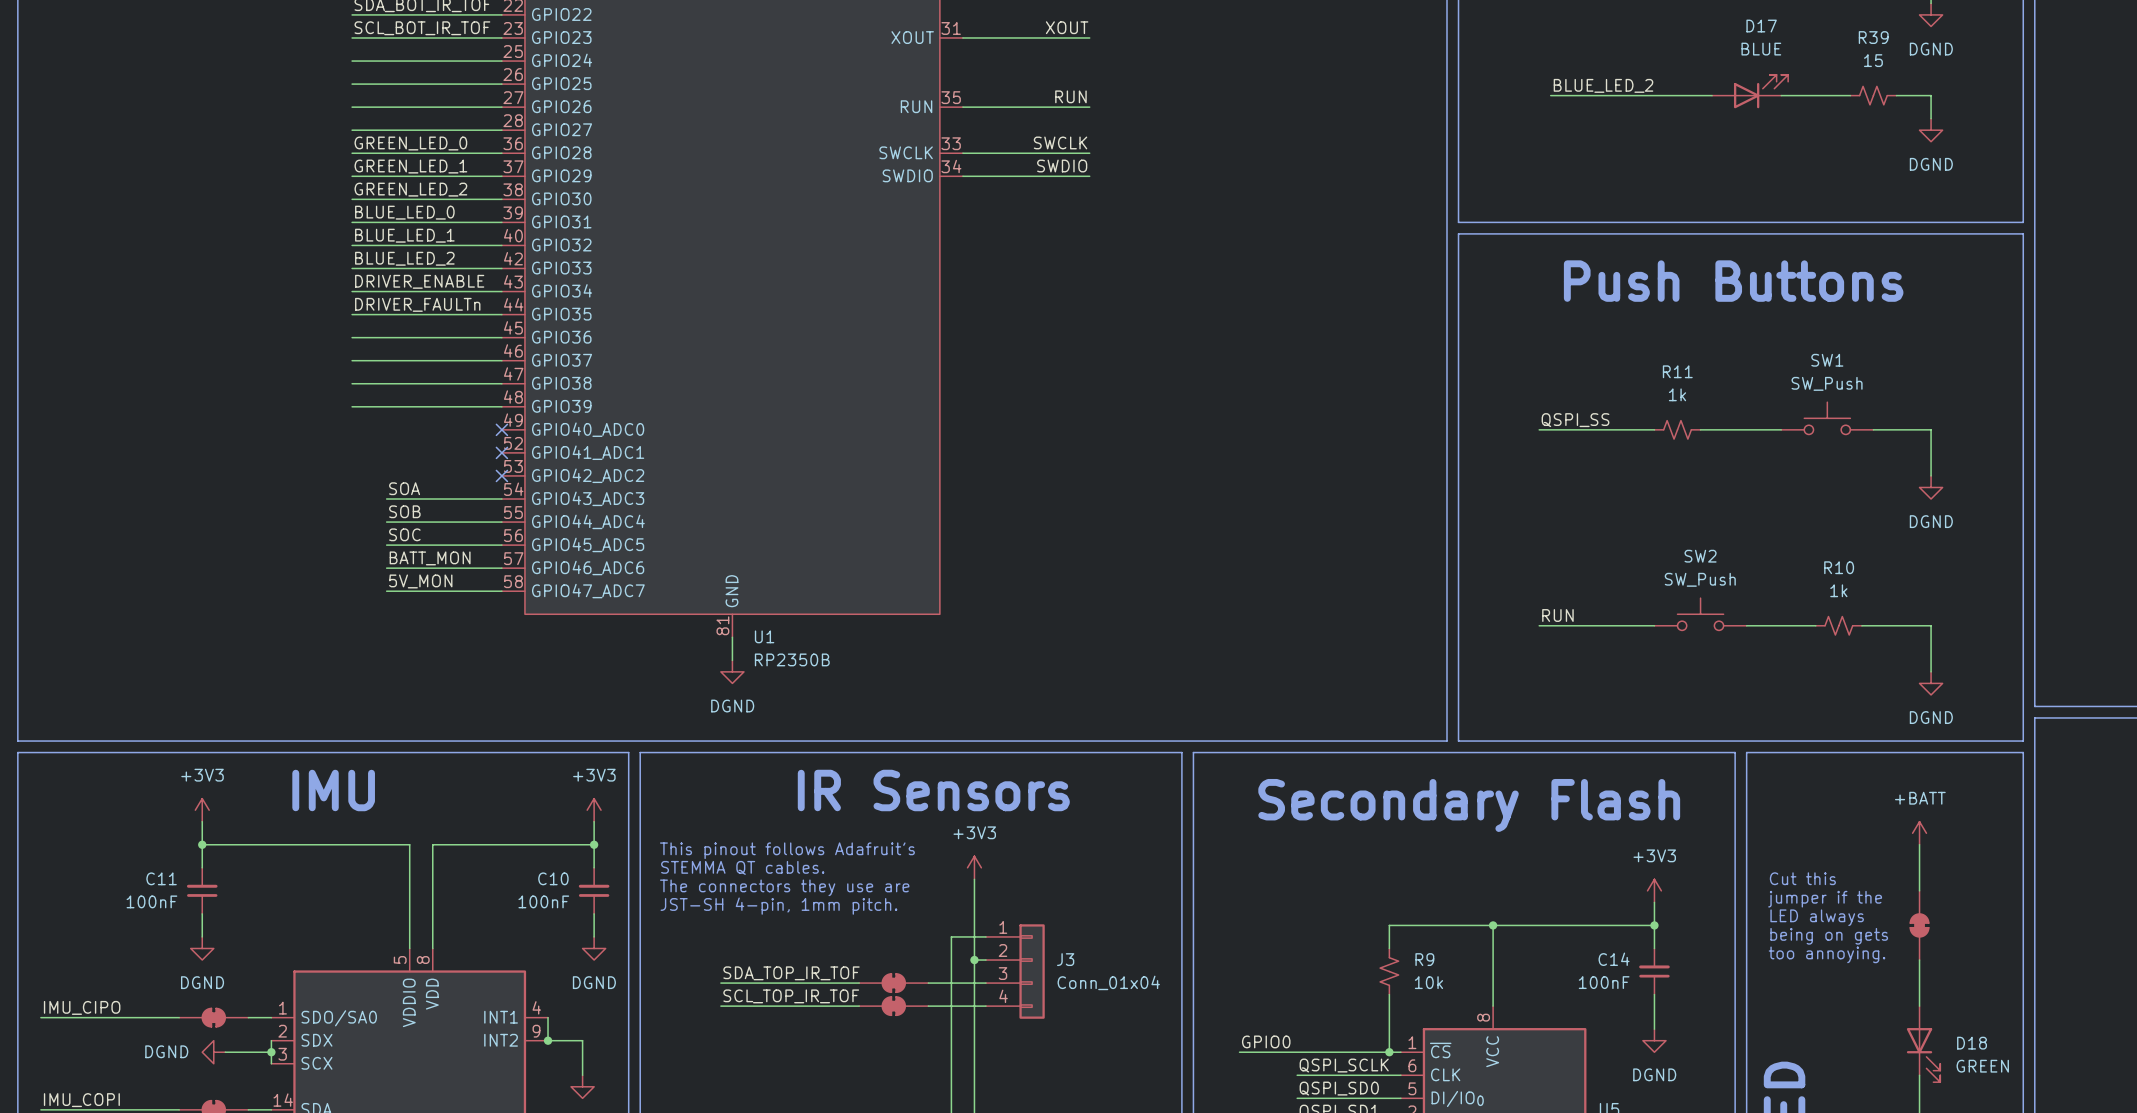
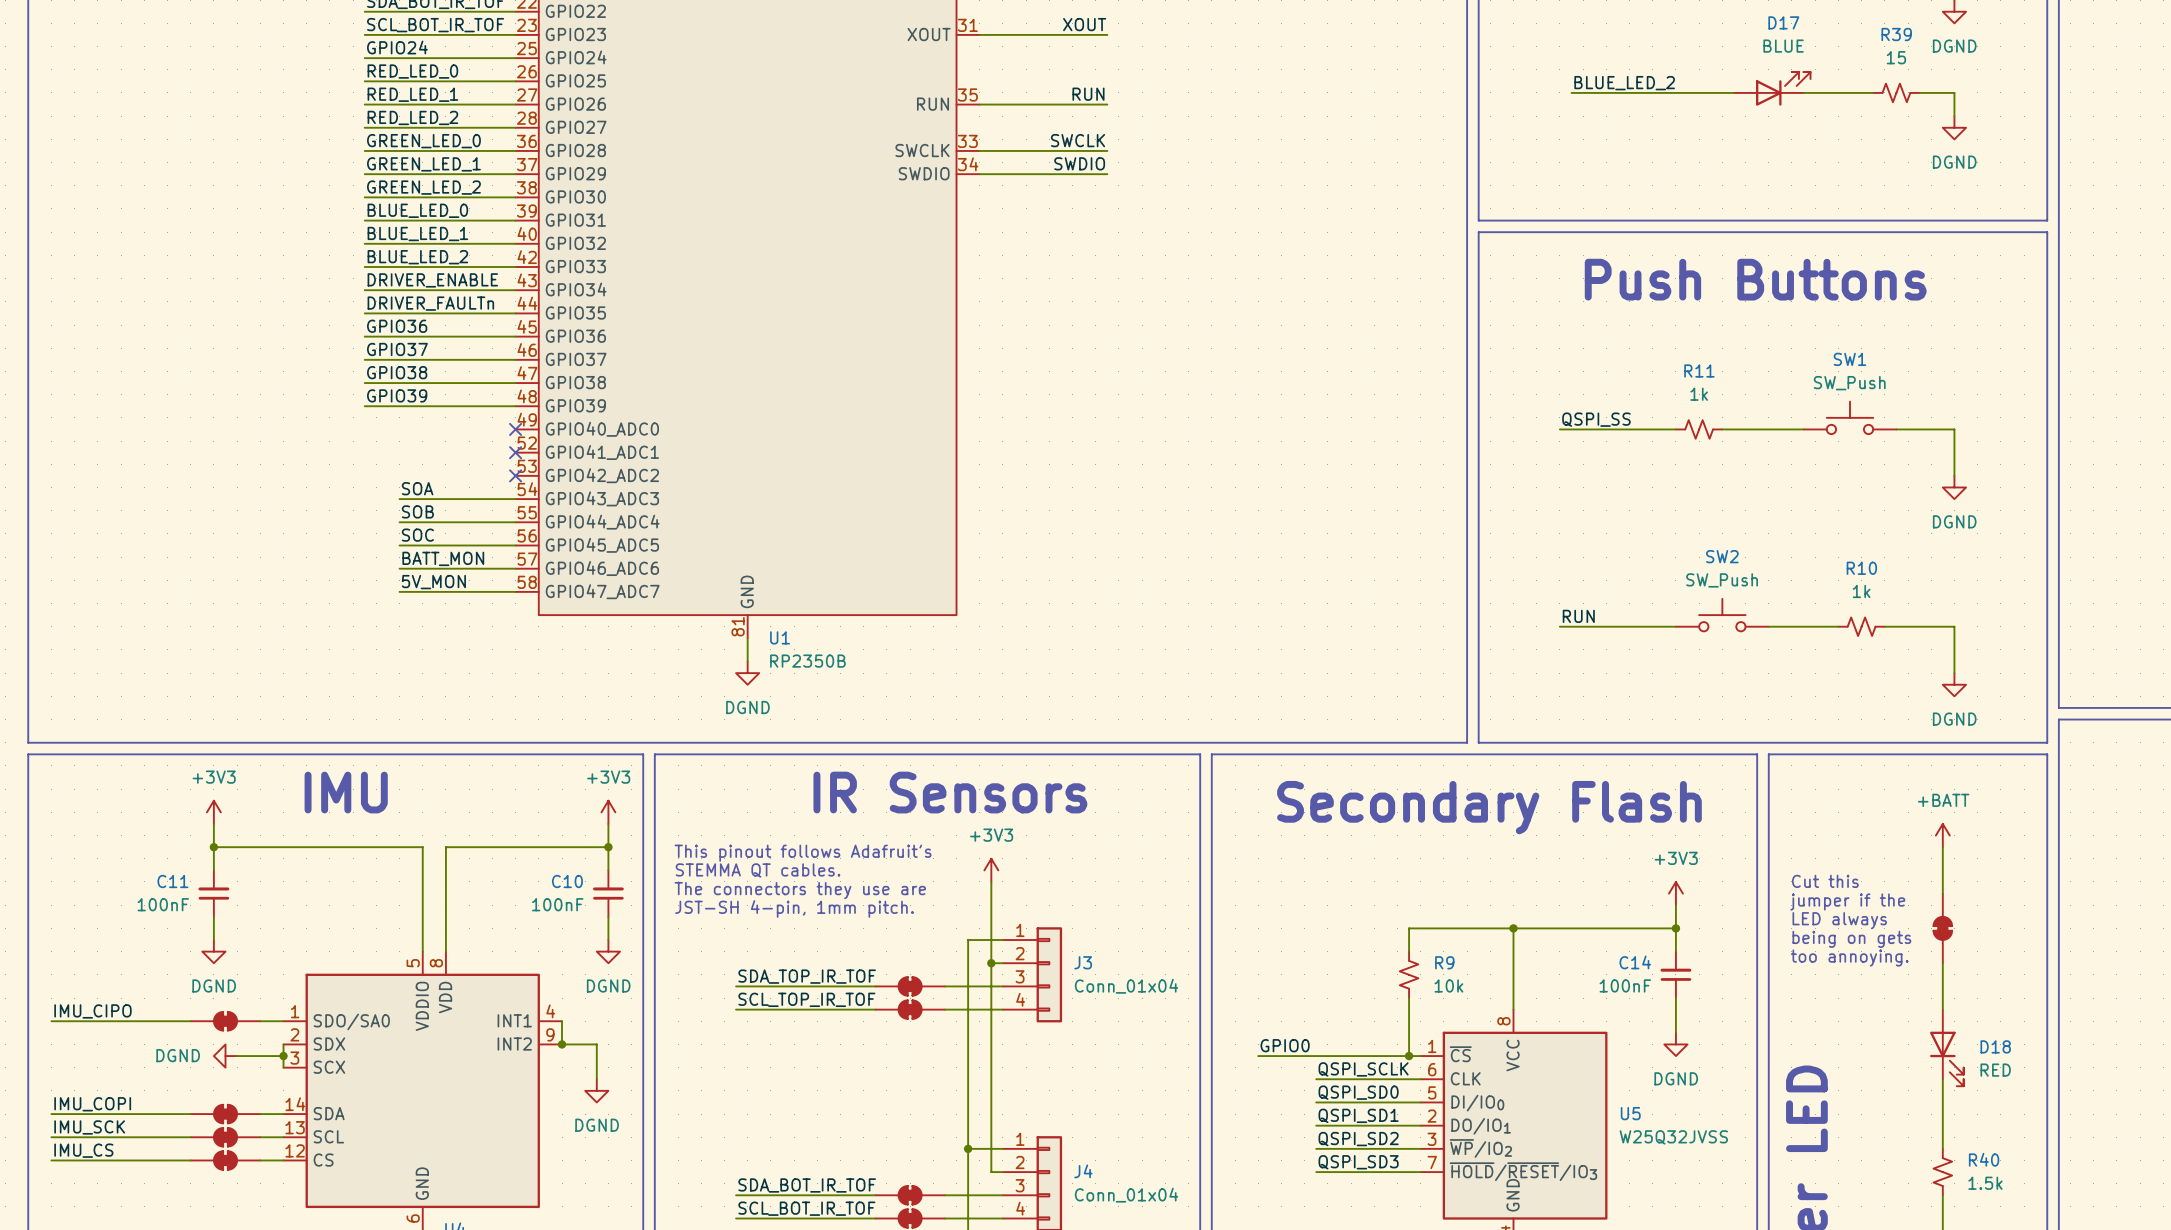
label: none -> GPIO24 (397, 47)
label: none -> RED_LED_0 (412, 71)
label: none -> RED_LED_1 (412, 94)
label: none -> RED_LED_2 (412, 117)
label: none -> GPIO36 (397, 326)
label: none -> GPIO37 (397, 349)
label: none -> GPIO38 (397, 372)
label: none -> GPIO39 (397, 395)
D18 value: GREEN (1982, 1066) -> RED (1995, 1070)

